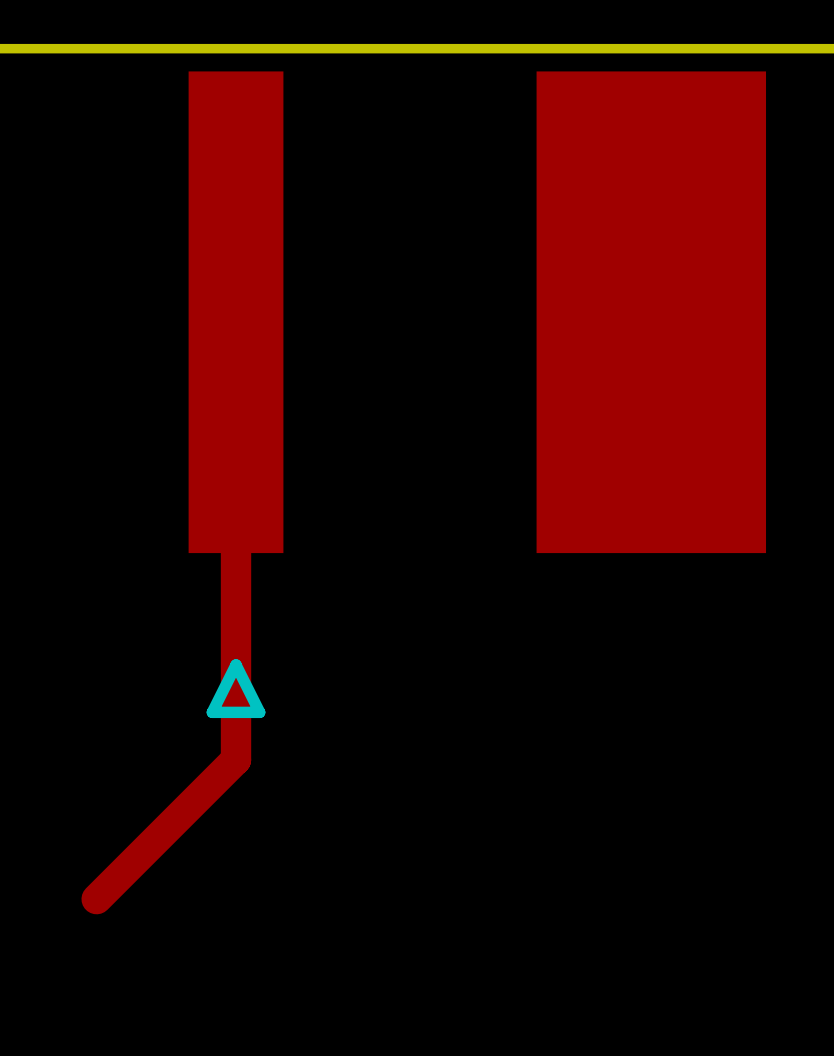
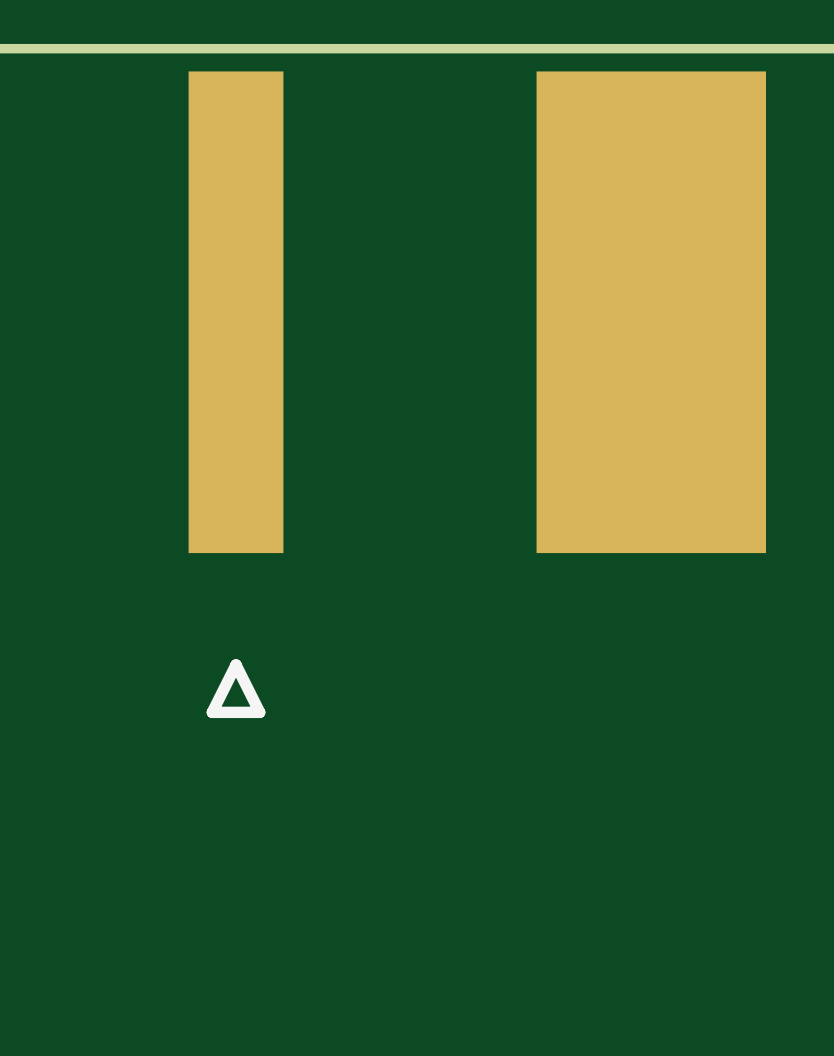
track: (236, 312) (236, 759) (96, 899) -> none

